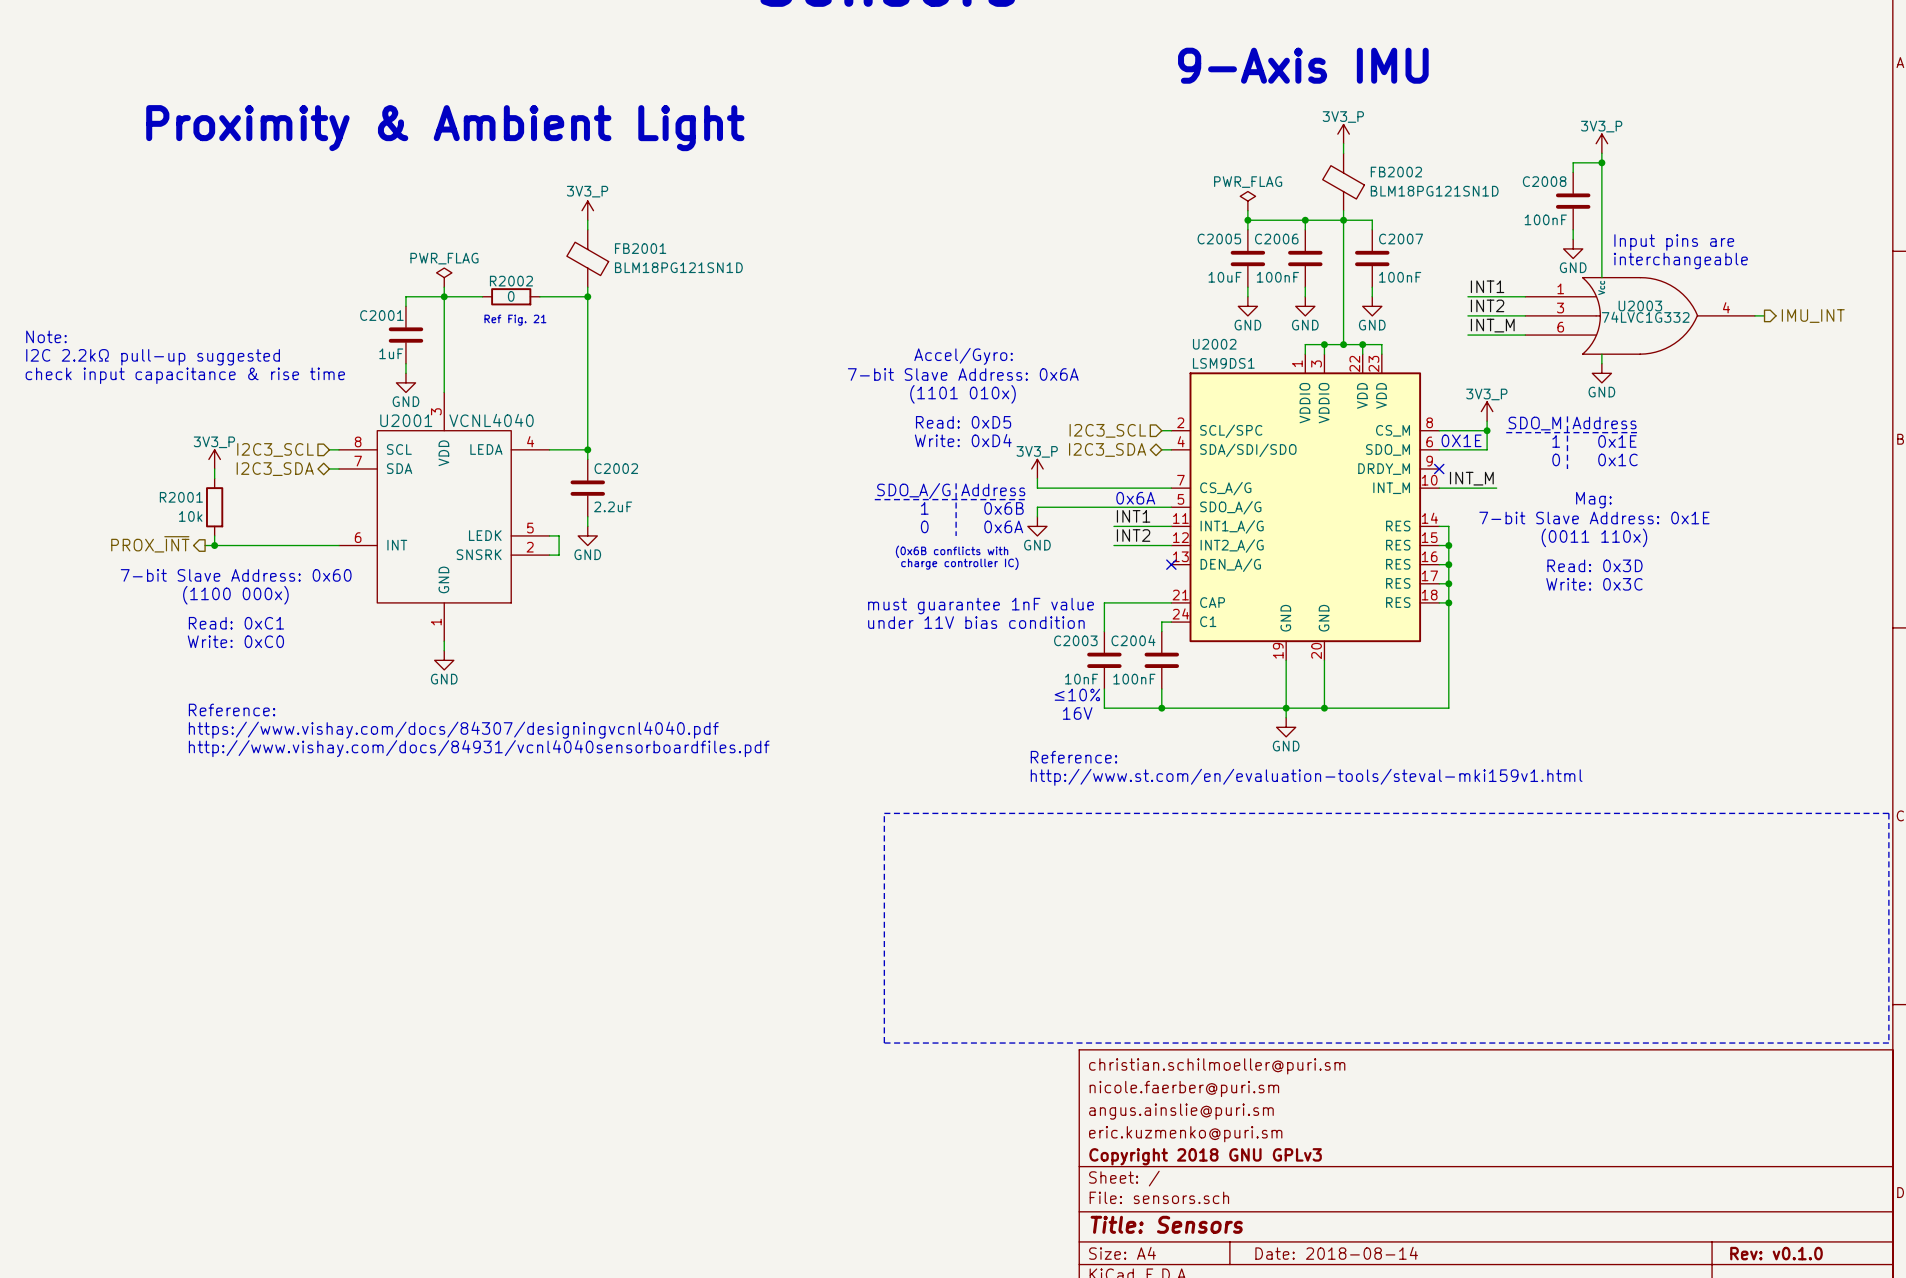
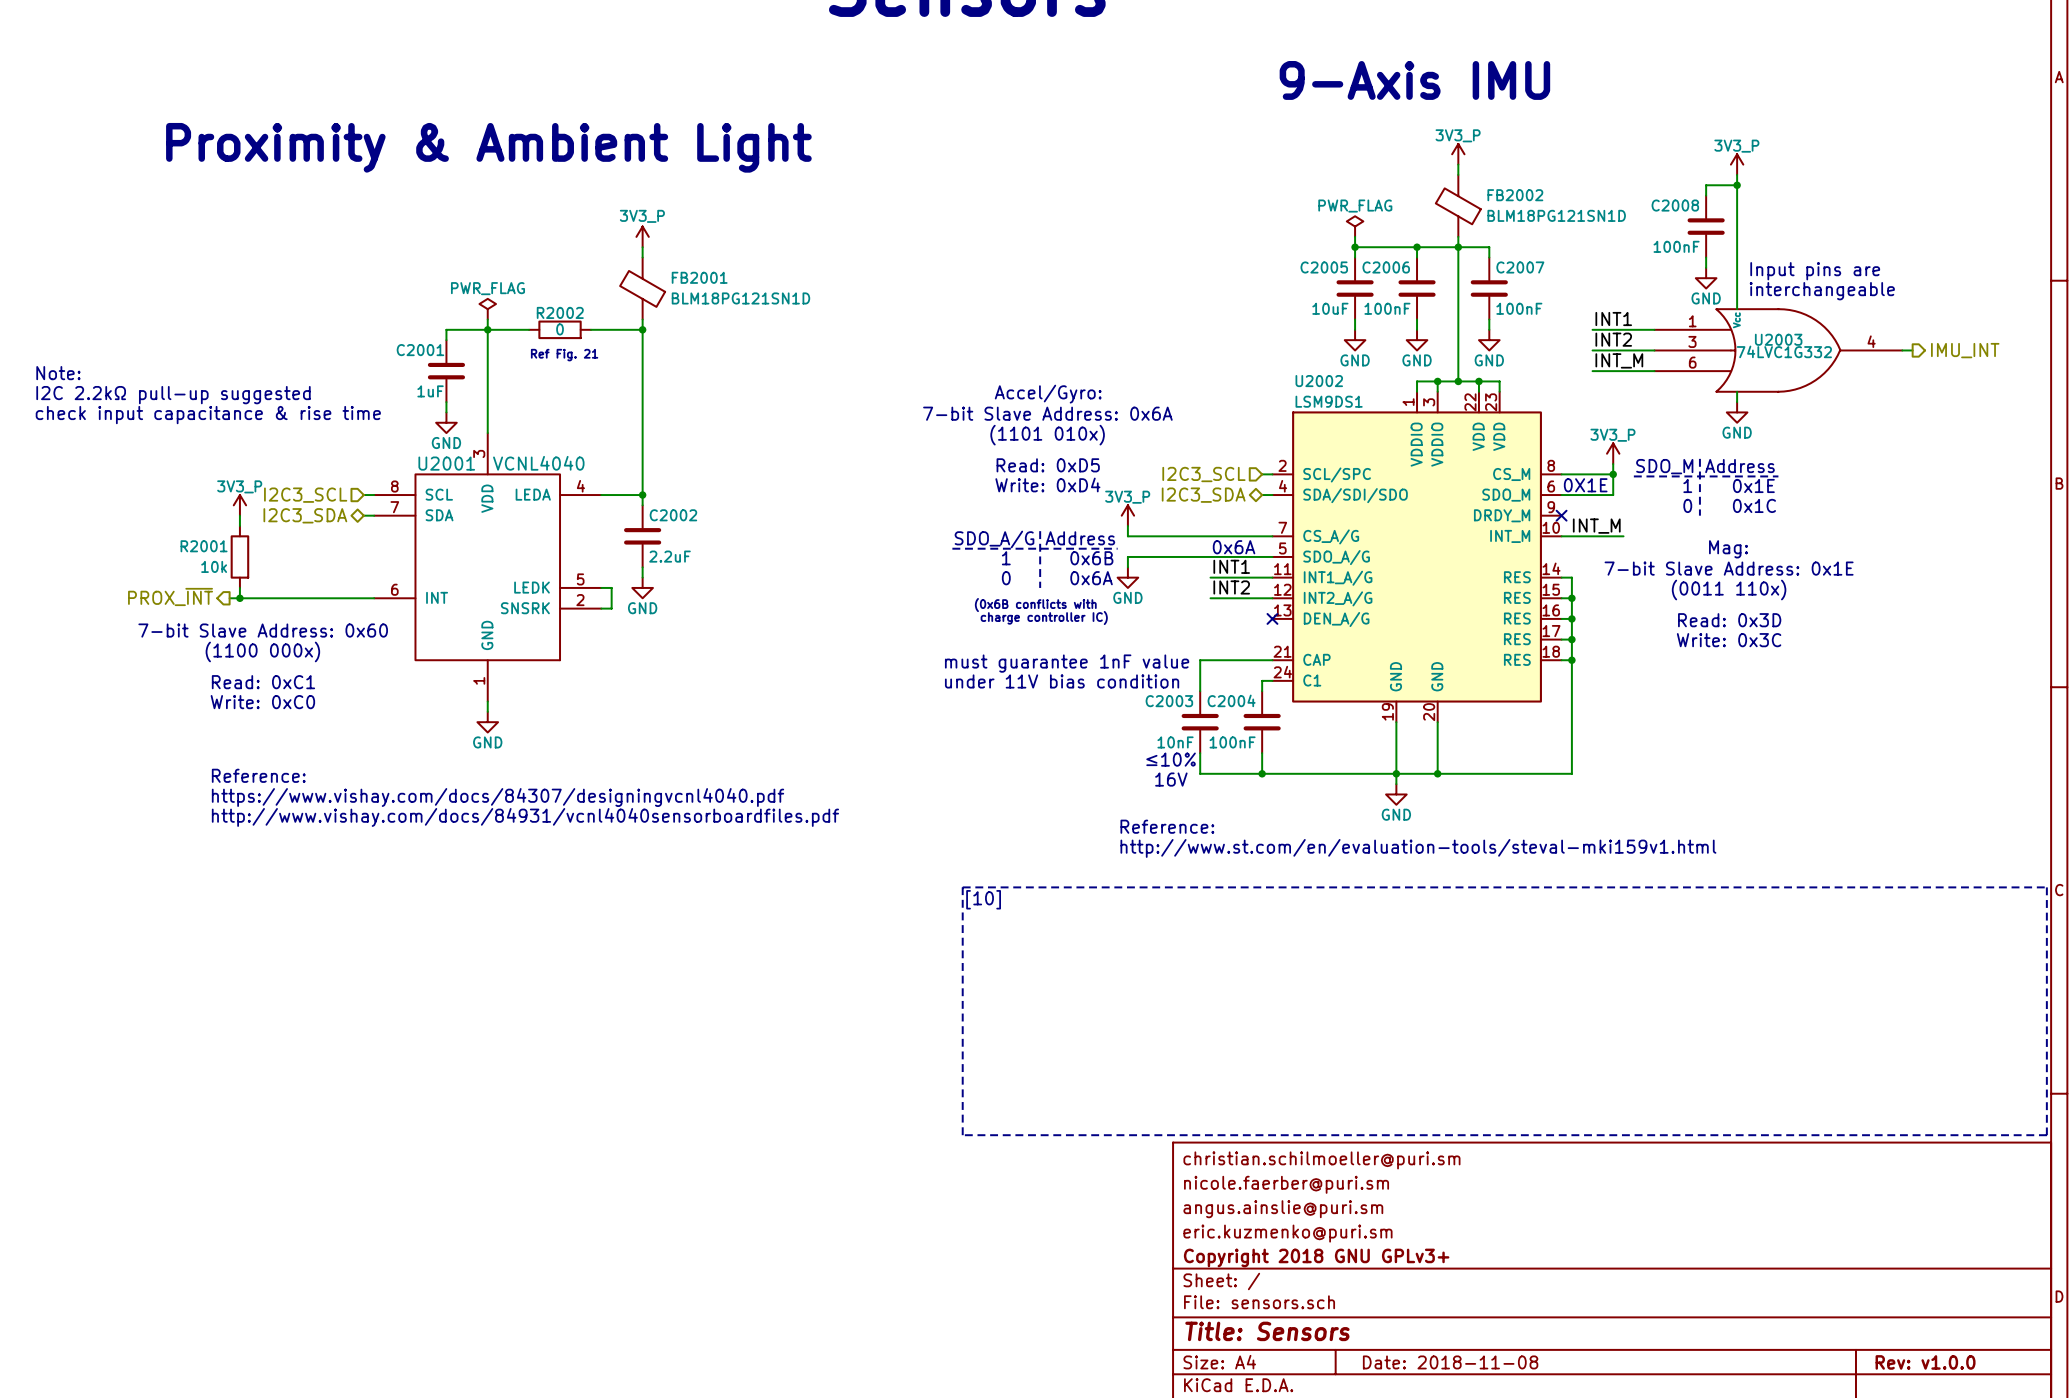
text: none -> [10] (983, 899)
title block: Copyright 2018 GNU GPLv3 (1205, 1156) -> Copyright 2018 GNU GPLv3+ (1316, 1257)
title block: Date: 2018-08-14 (1336, 1253) -> Date: 2018-11-08 (1450, 1362)
title block: Rev: v0.1.0 (1776, 1253) -> Rev: v1.0.0 (1925, 1362)

